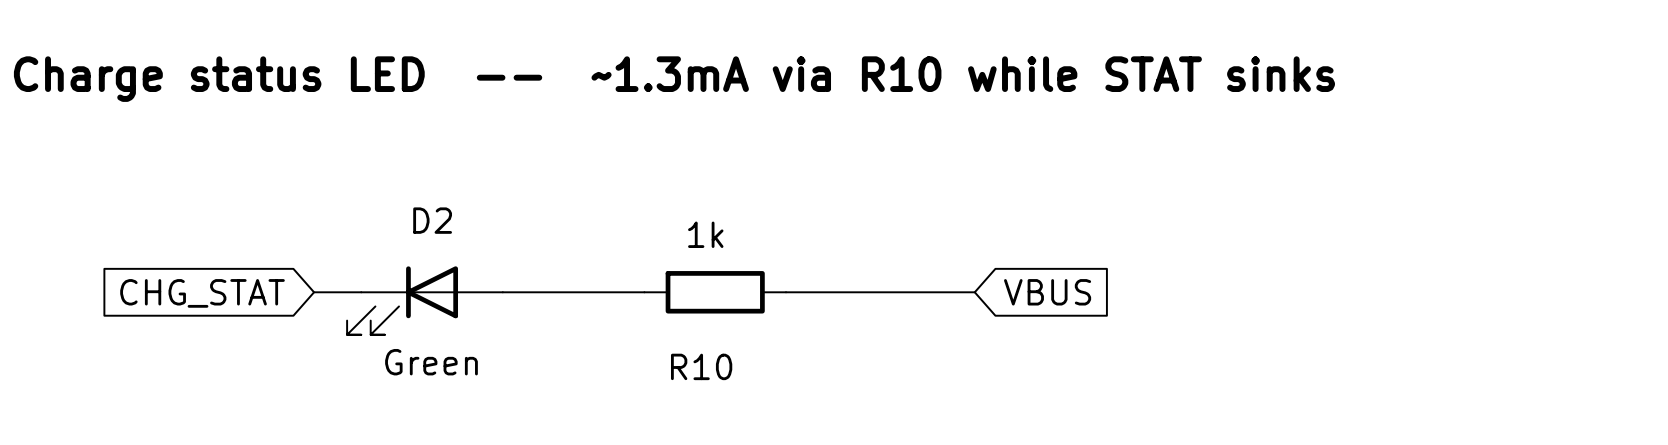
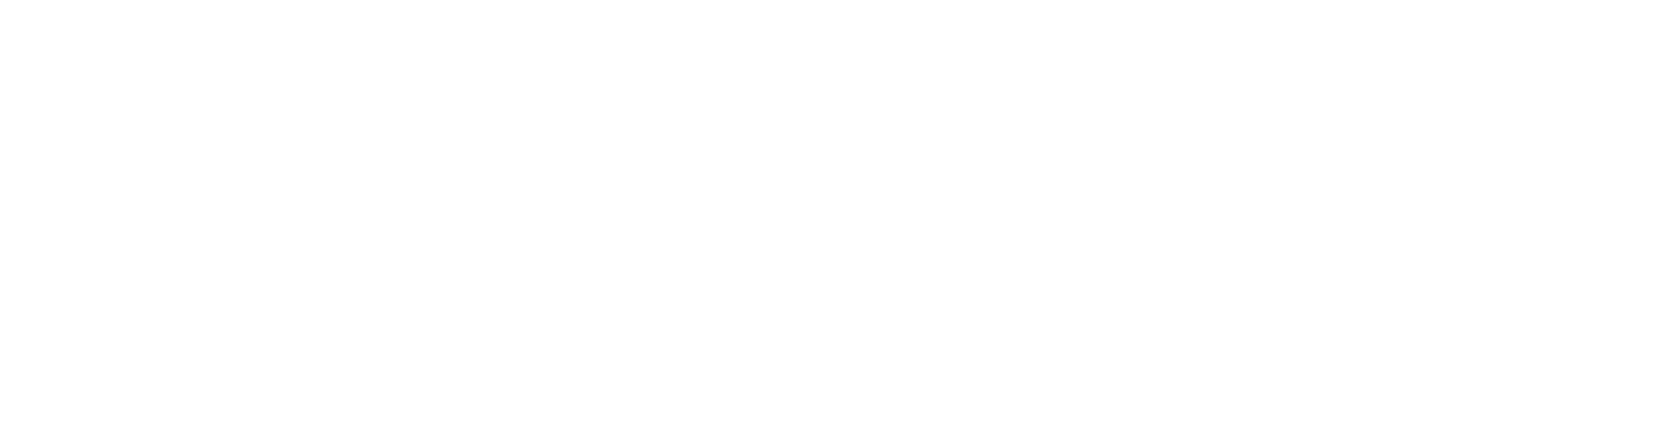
text: Charge status LED -- ~1.3mA via R10 while STAT sinks (674, 79) -> none
wire: (314, 292) (361, 292) -> none
wire: (502, 292) (644, 292) -> none
R10: 1k (715, 292) -> none
wire: (786, 292) (974, 292) -> none
global label: VBUS (1047, 292) -> none
global label: CHG_STAT (202, 293) -> none
D2: Green (424, 300) -> none

